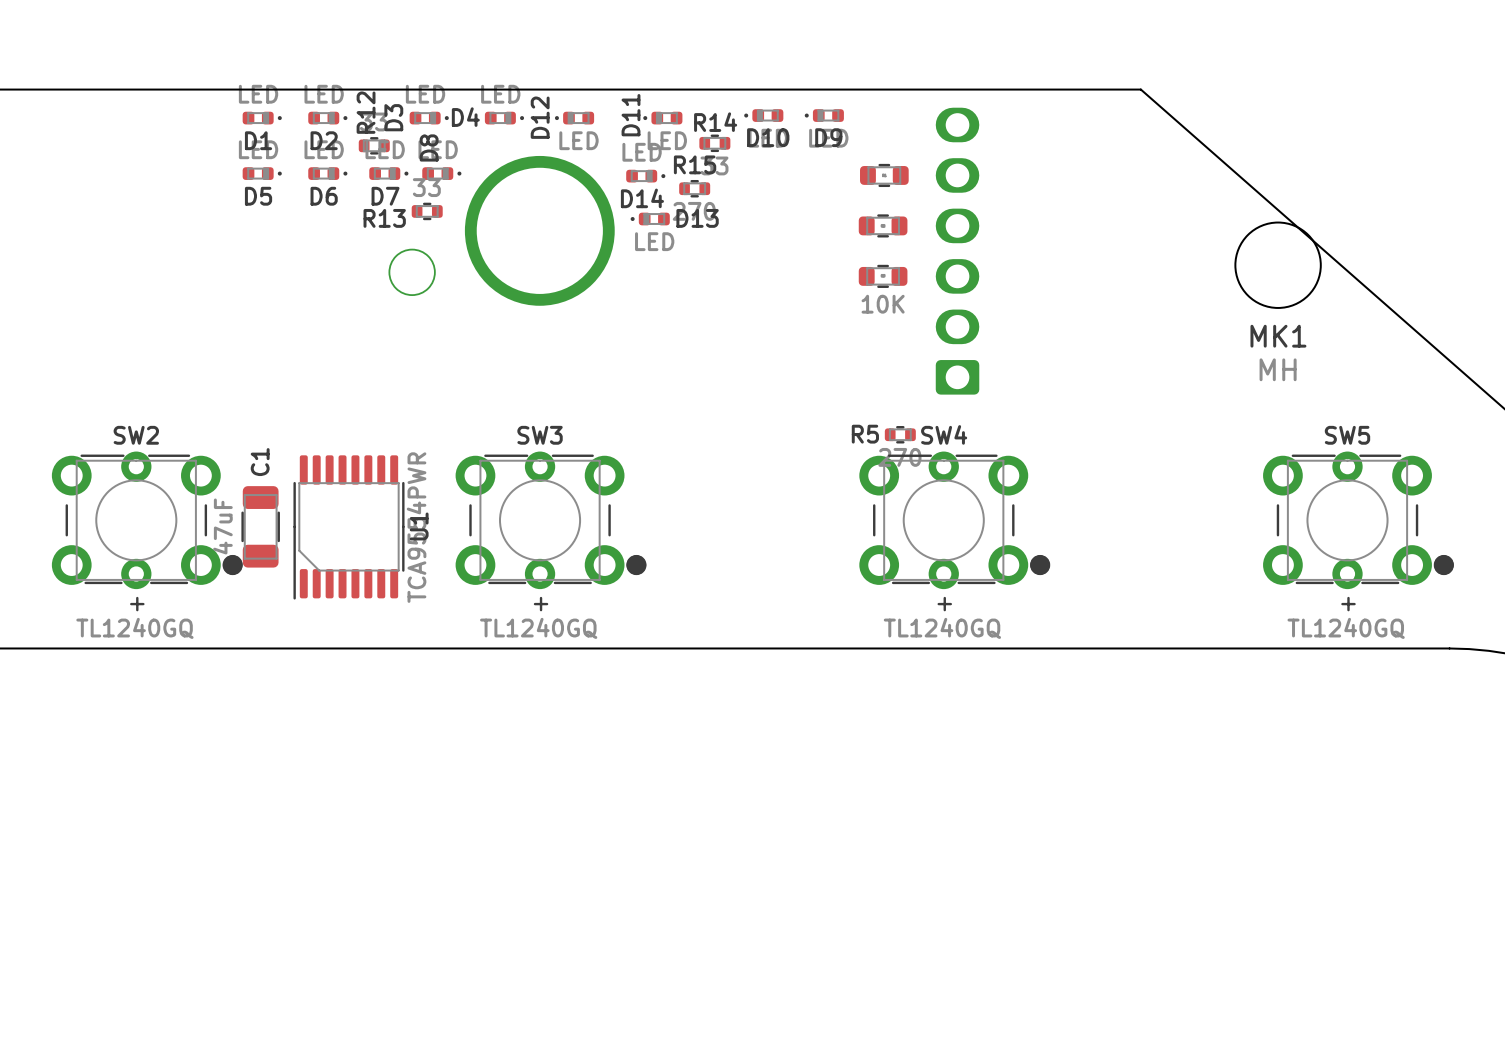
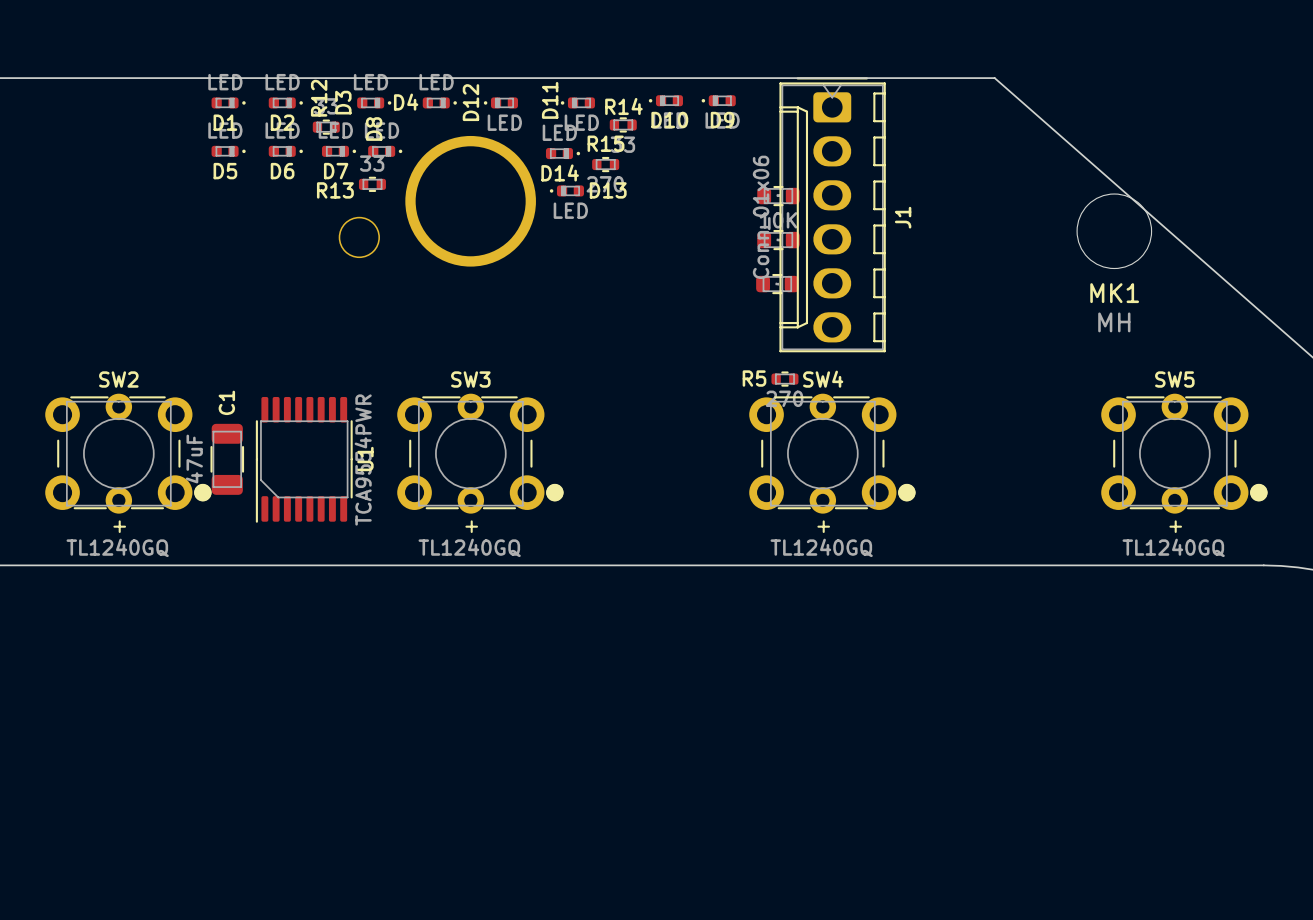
part position: (884, 175) -> (777, 284)
part position: (883, 225) -> (778, 240)
J1 side: bottom (957, 251) -> top (832, 214)
part position: (883, 276) -> (778, 196)

